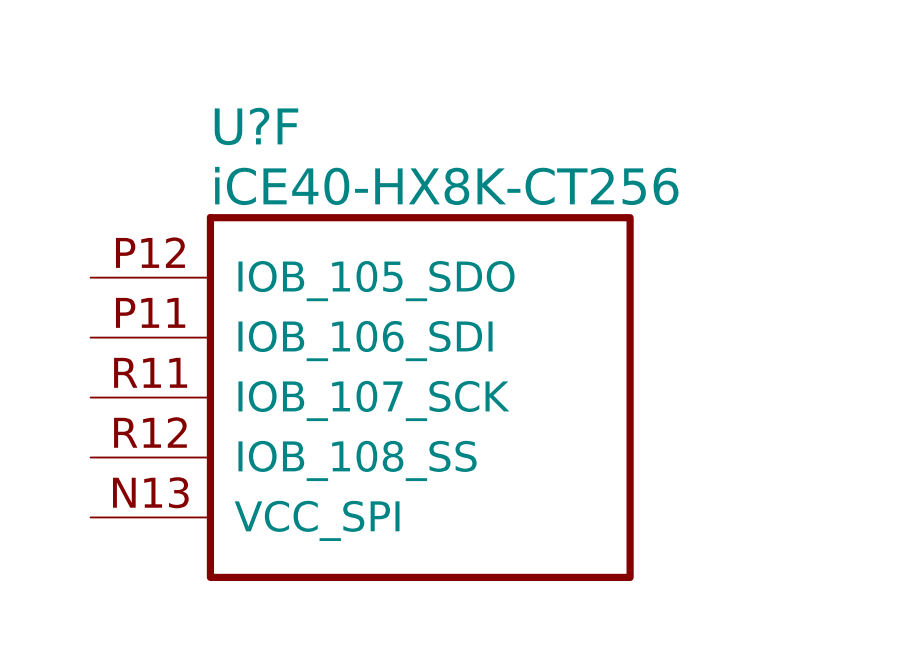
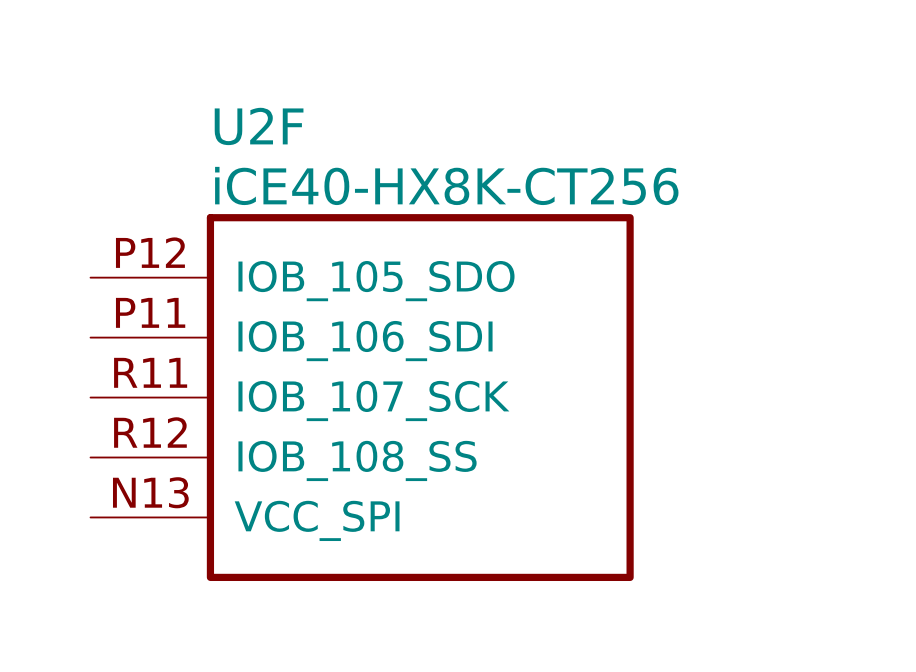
U?F name: U?F (256, 126) -> U2F (259, 126)

